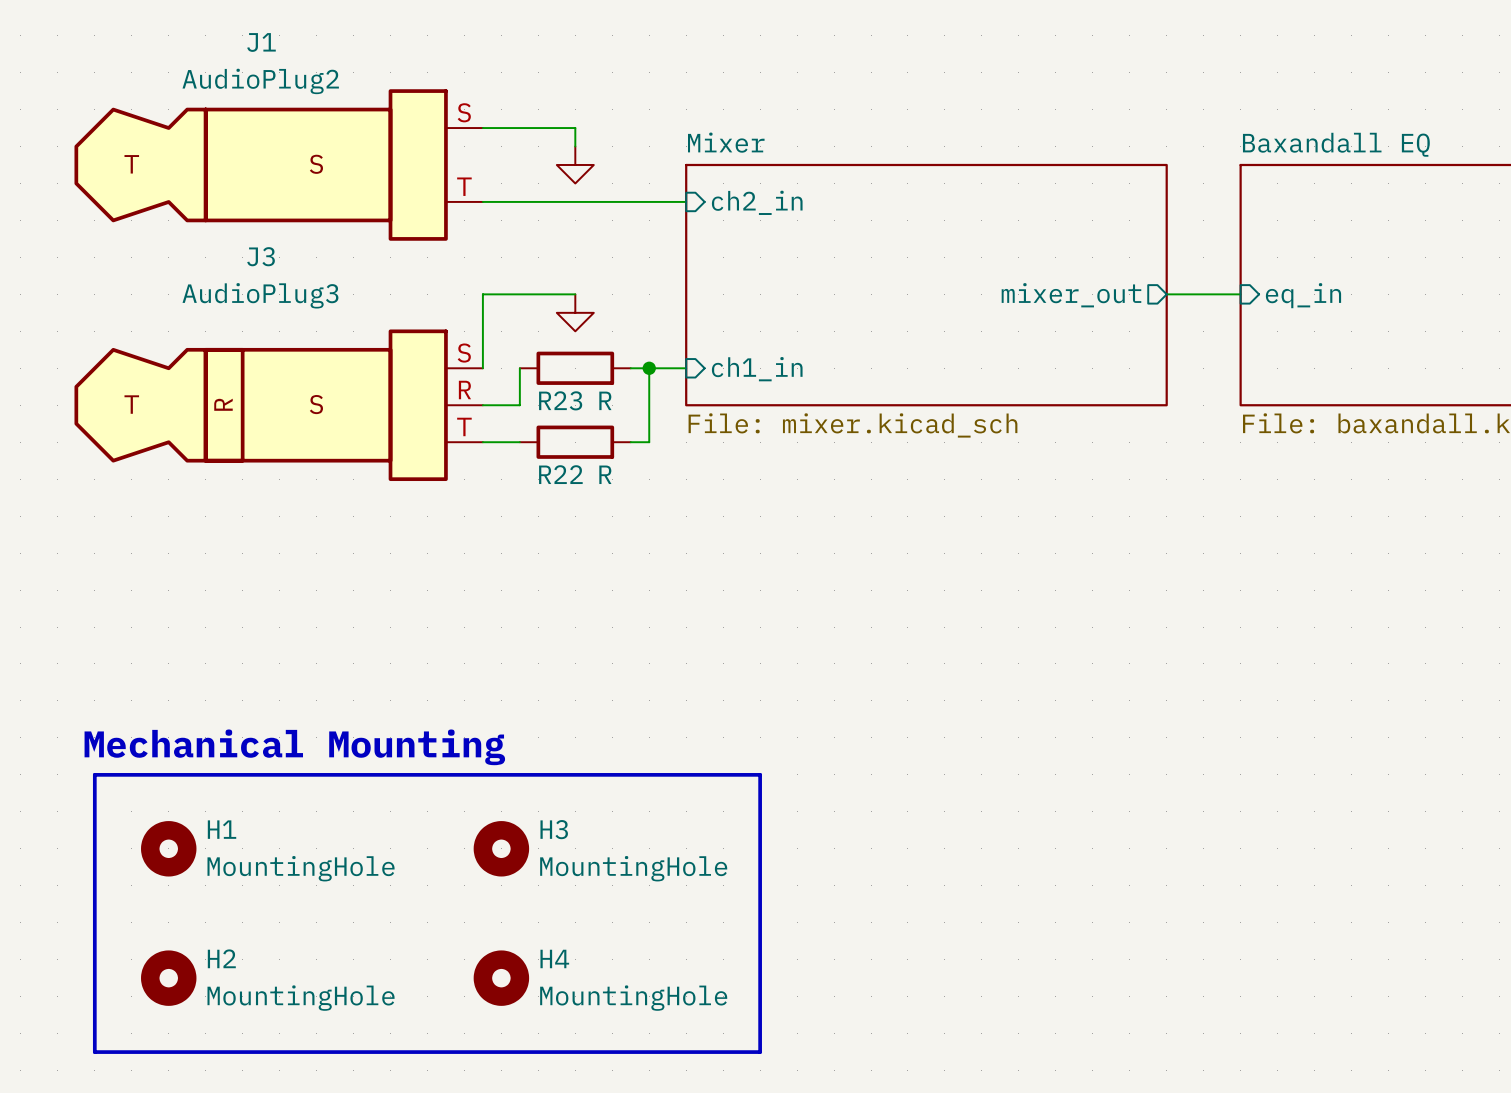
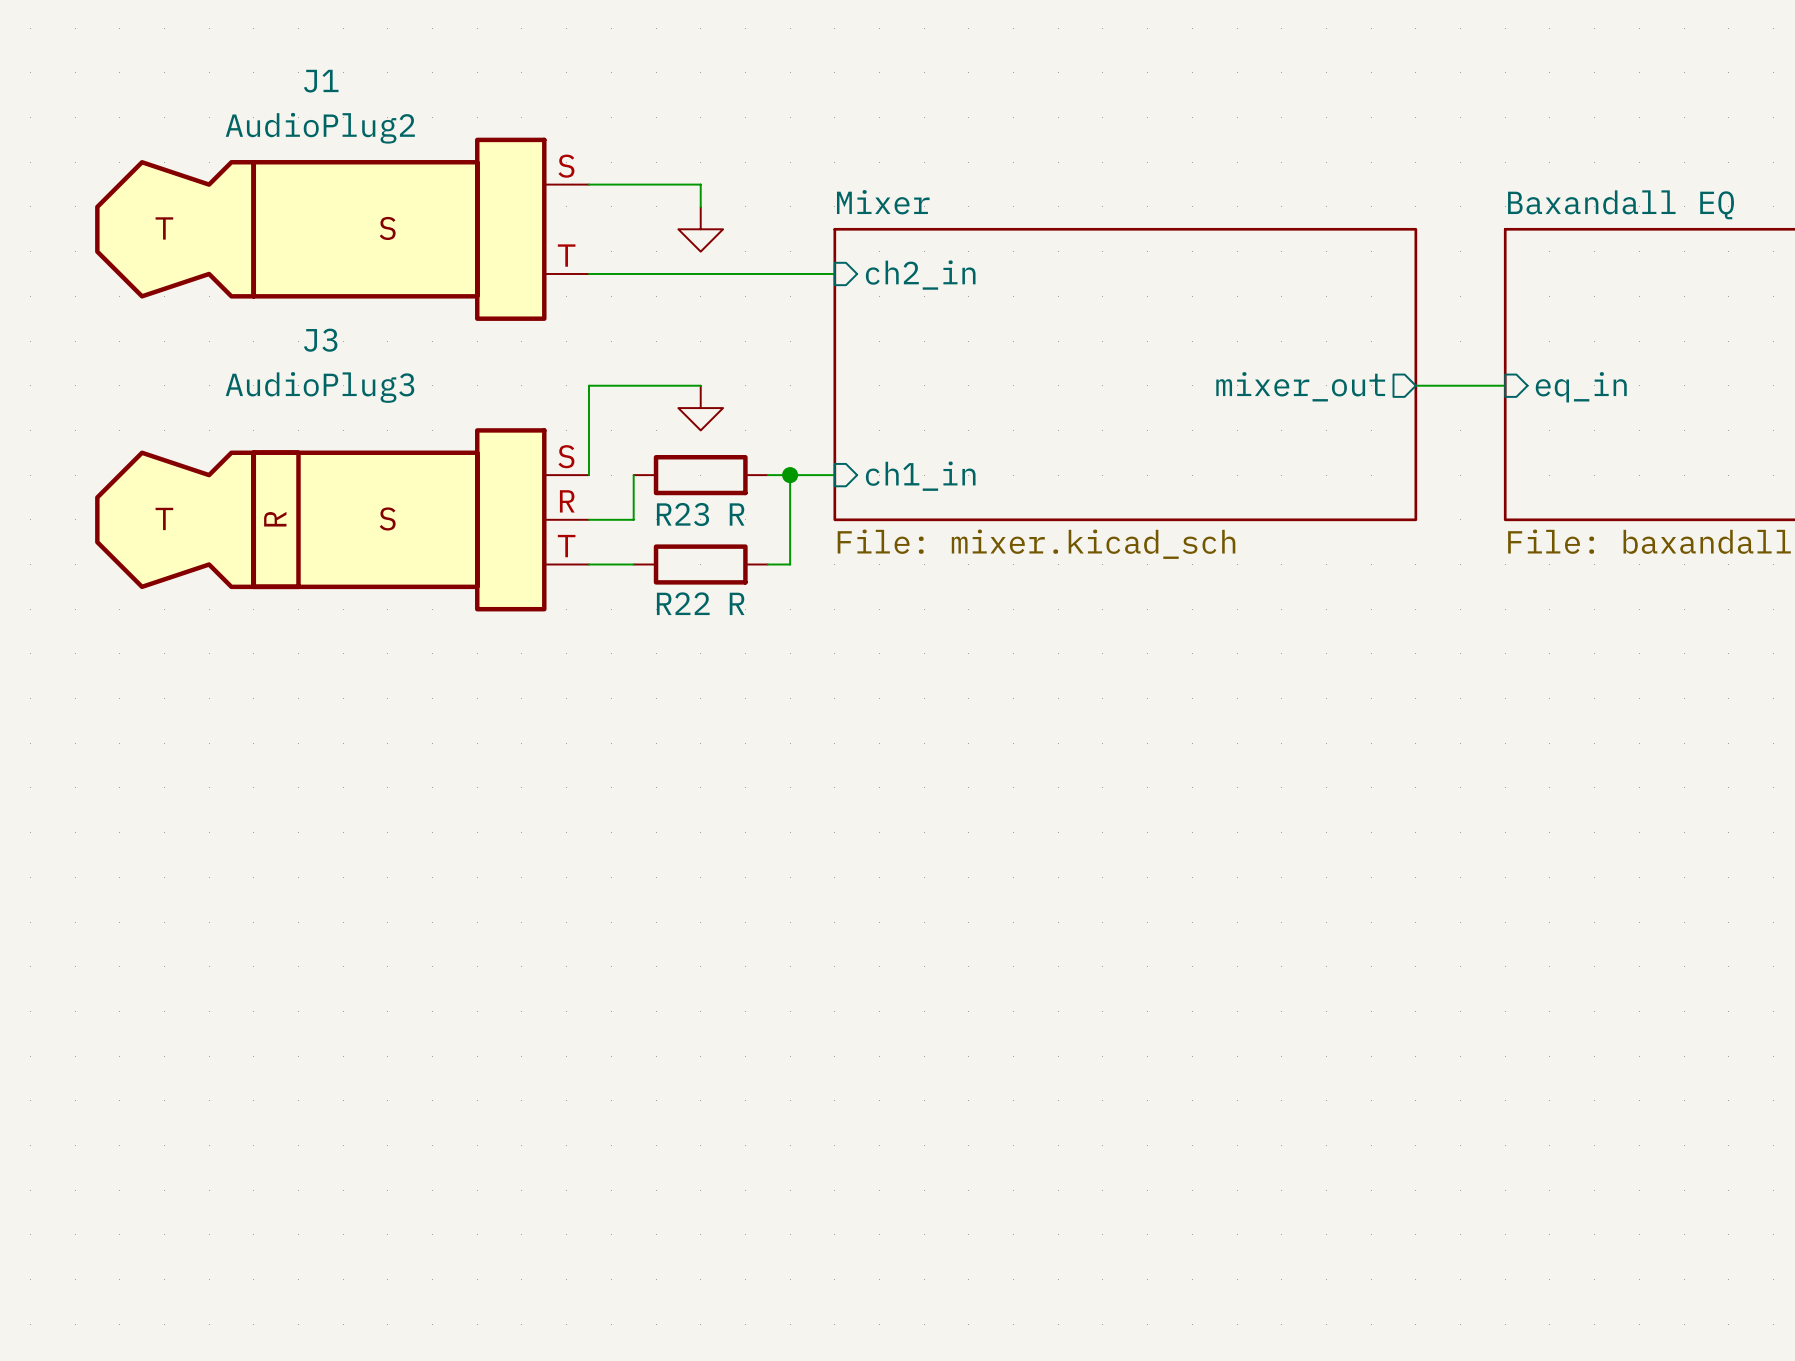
text: Mechanical Mounting (294, 747) -> none
line: (94, 774) (760, 774) (760, 1052) (94, 1052) (94, 774) -> none
H1: MountingHole (168, 848) -> none
H3: MountingHole (501, 848) -> none
H2: MountingHole (168, 978) -> none
H4: MountingHole (501, 978) -> none

